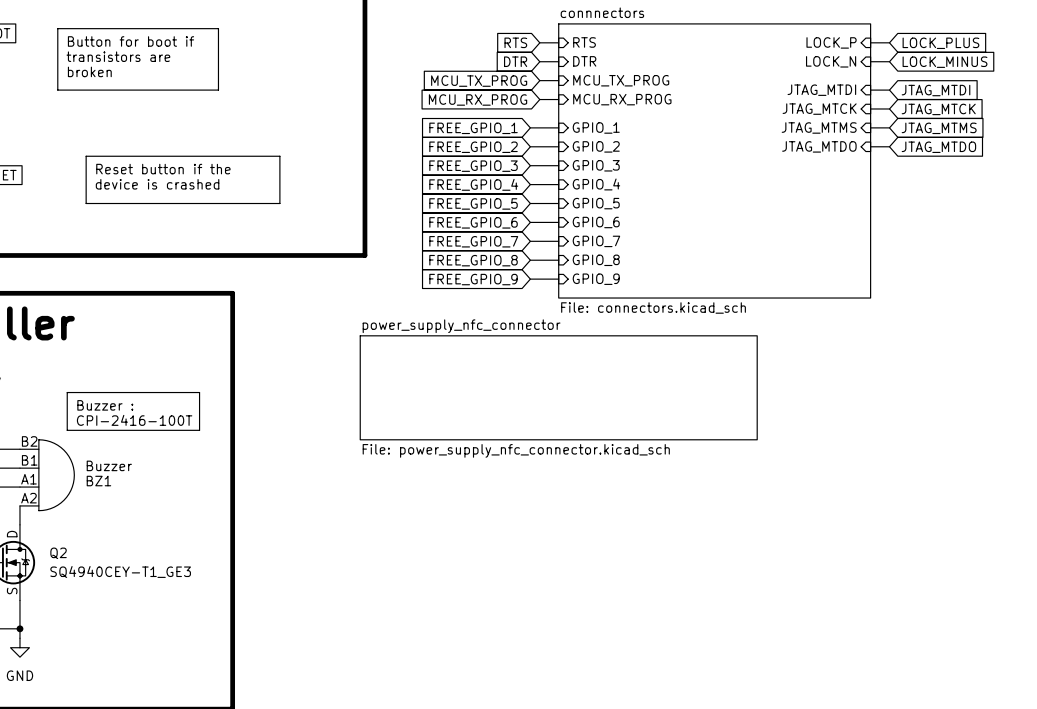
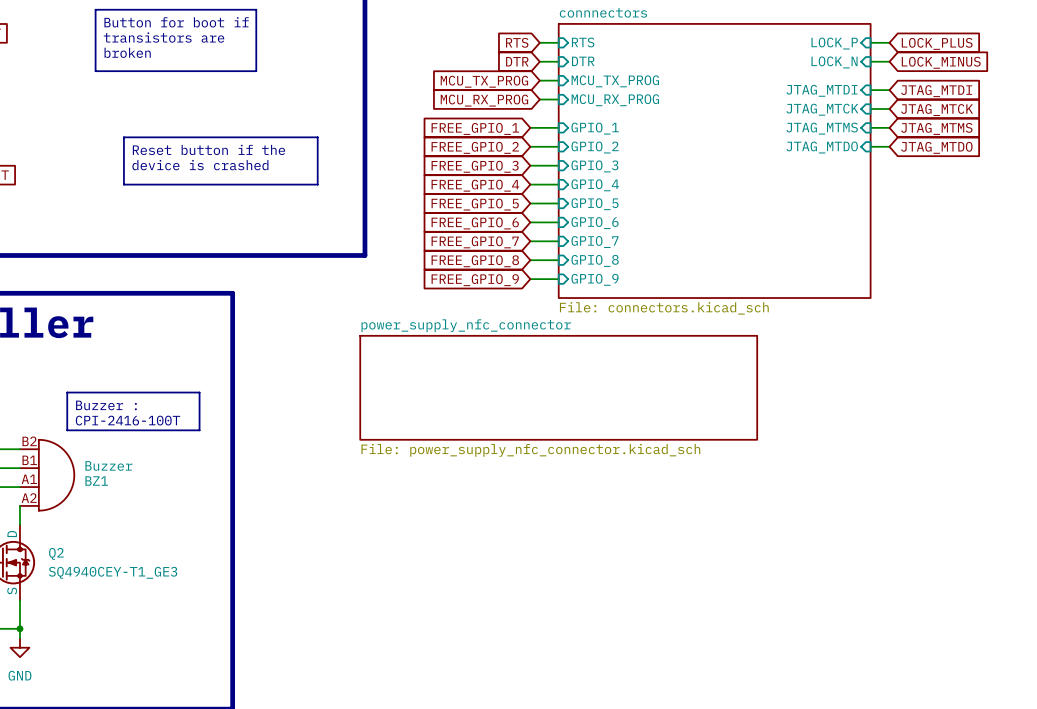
line: (57, 28) (218, 28) (218, 90) (57, 90) (57, 28) -> (95, 9) (256, 9) (256, 71) (95, 71) (95, 9)
text position: Button for boot if (131, 41) -> Button for boot if (176, 22)
text position: transistors are (118, 56) -> transistors are (164, 37)
text position: broken (89, 71) -> broken (127, 52)
line: (86, 156) (279, 156) (279, 203) (86, 203) (86, 156) -> (123, 137) (317, 137) (317, 184) (123, 184) (123, 137)
text position: Reset button if the (163, 169) -> Reset button if the (208, 149)
text position: device is crashed (157, 184) -> device is crashed (200, 165)

